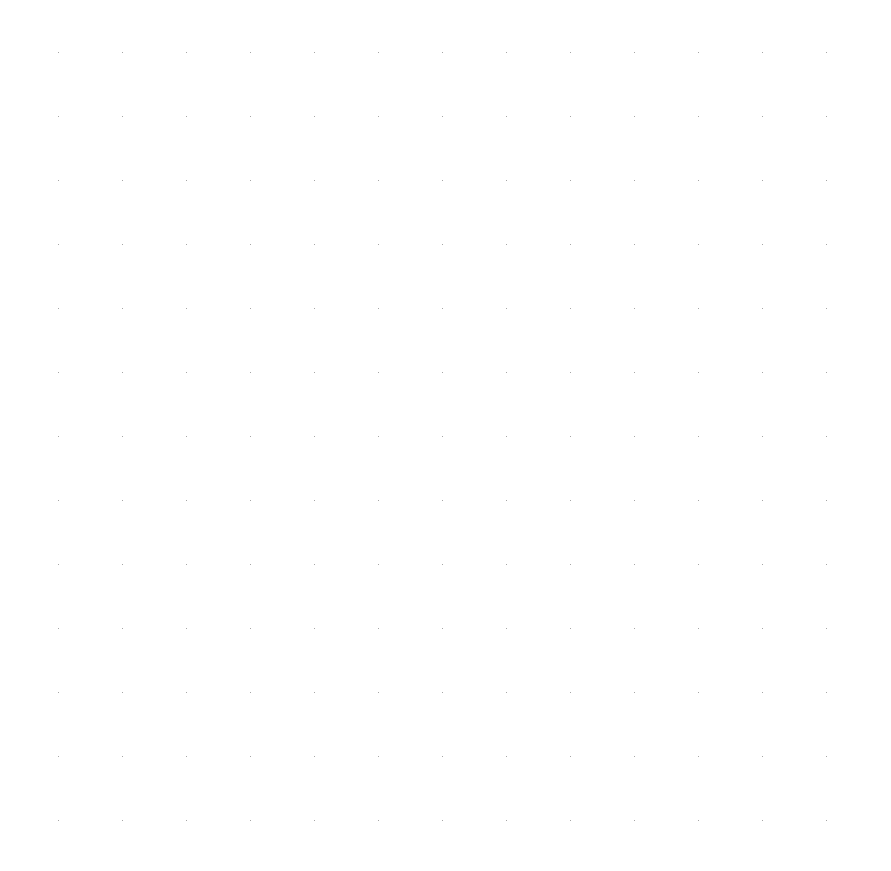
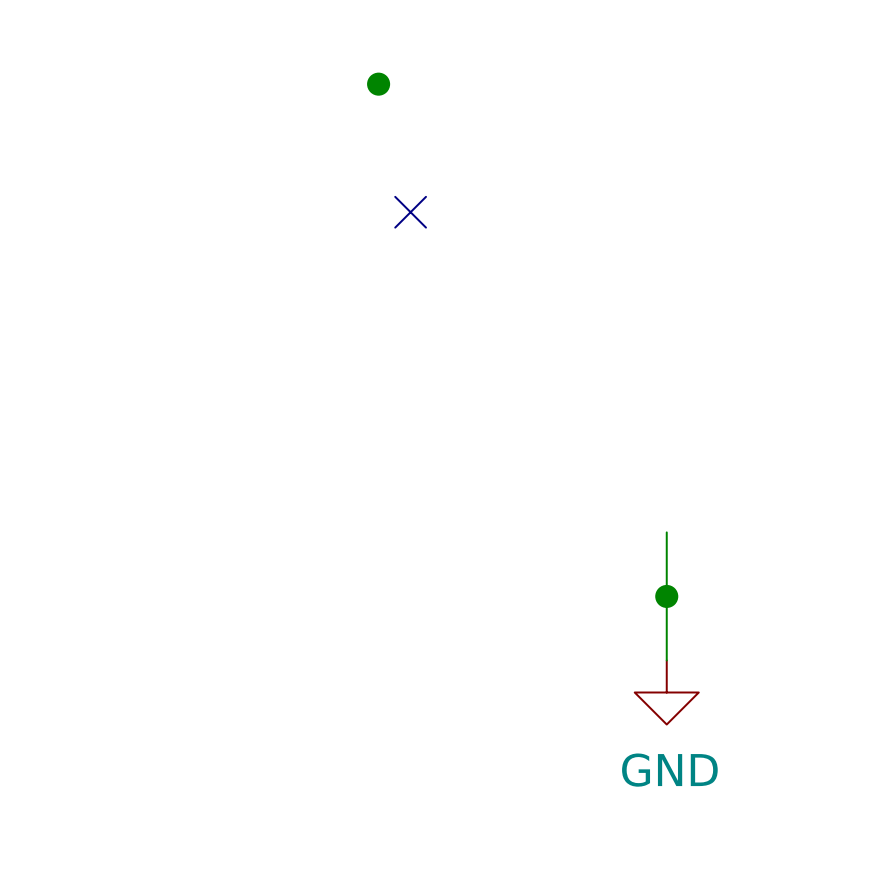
junction: none -> (378, 84)
no-connect mark: none -> (410, 212)
wire: none -> (666, 532) (666, 660)
junction: none -> (666, 596)
power symbol: none -> GND (666, 692)

